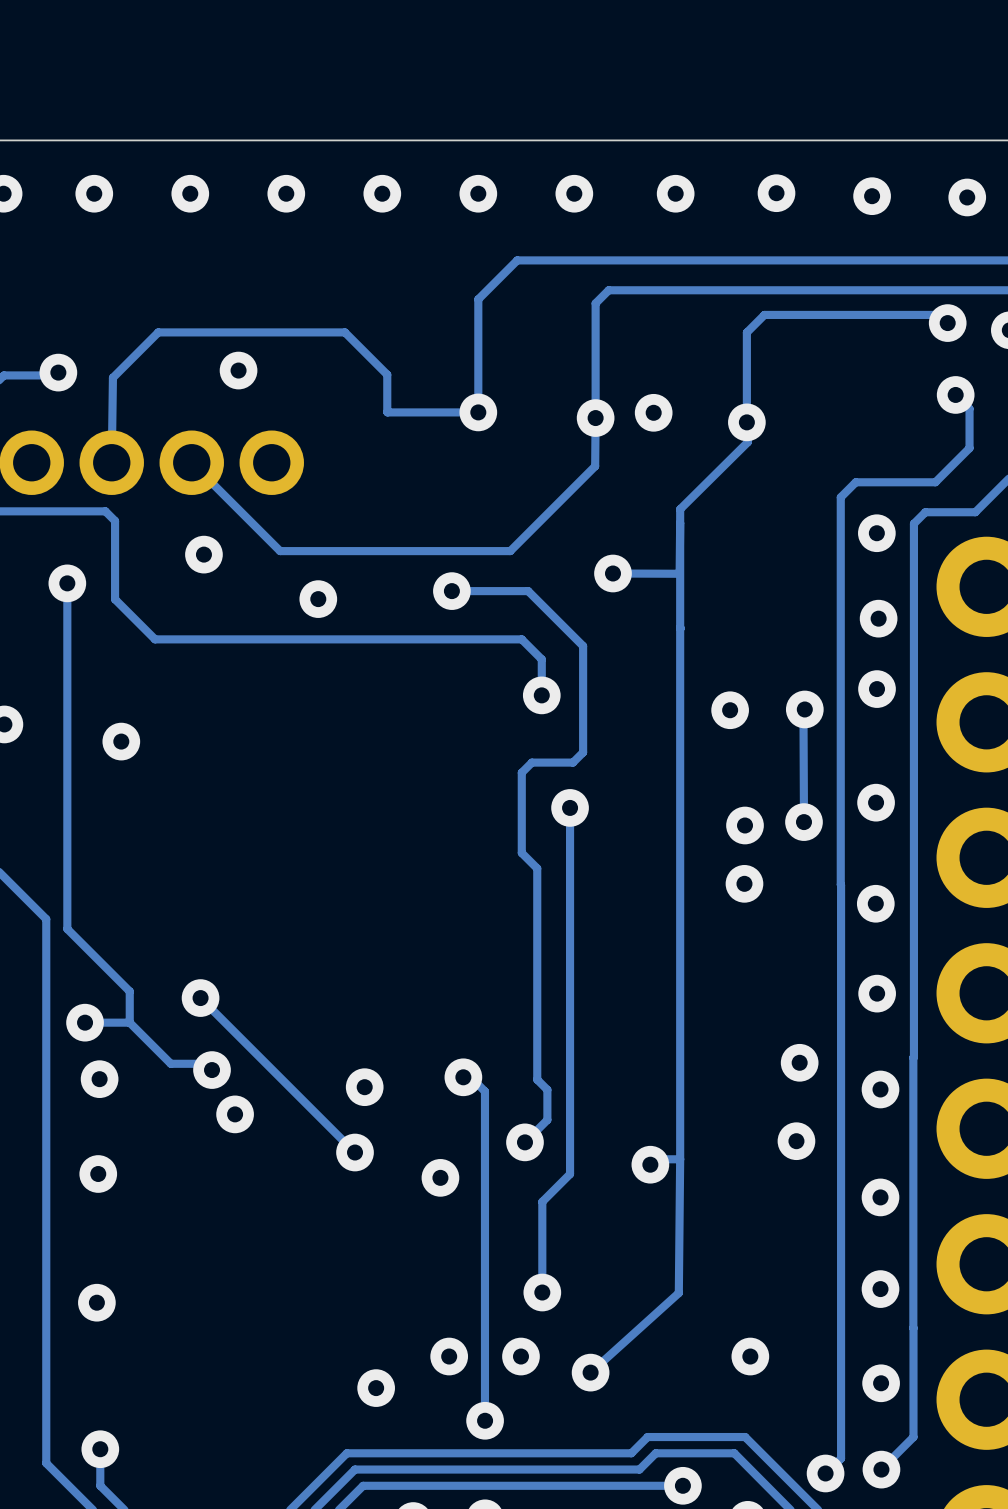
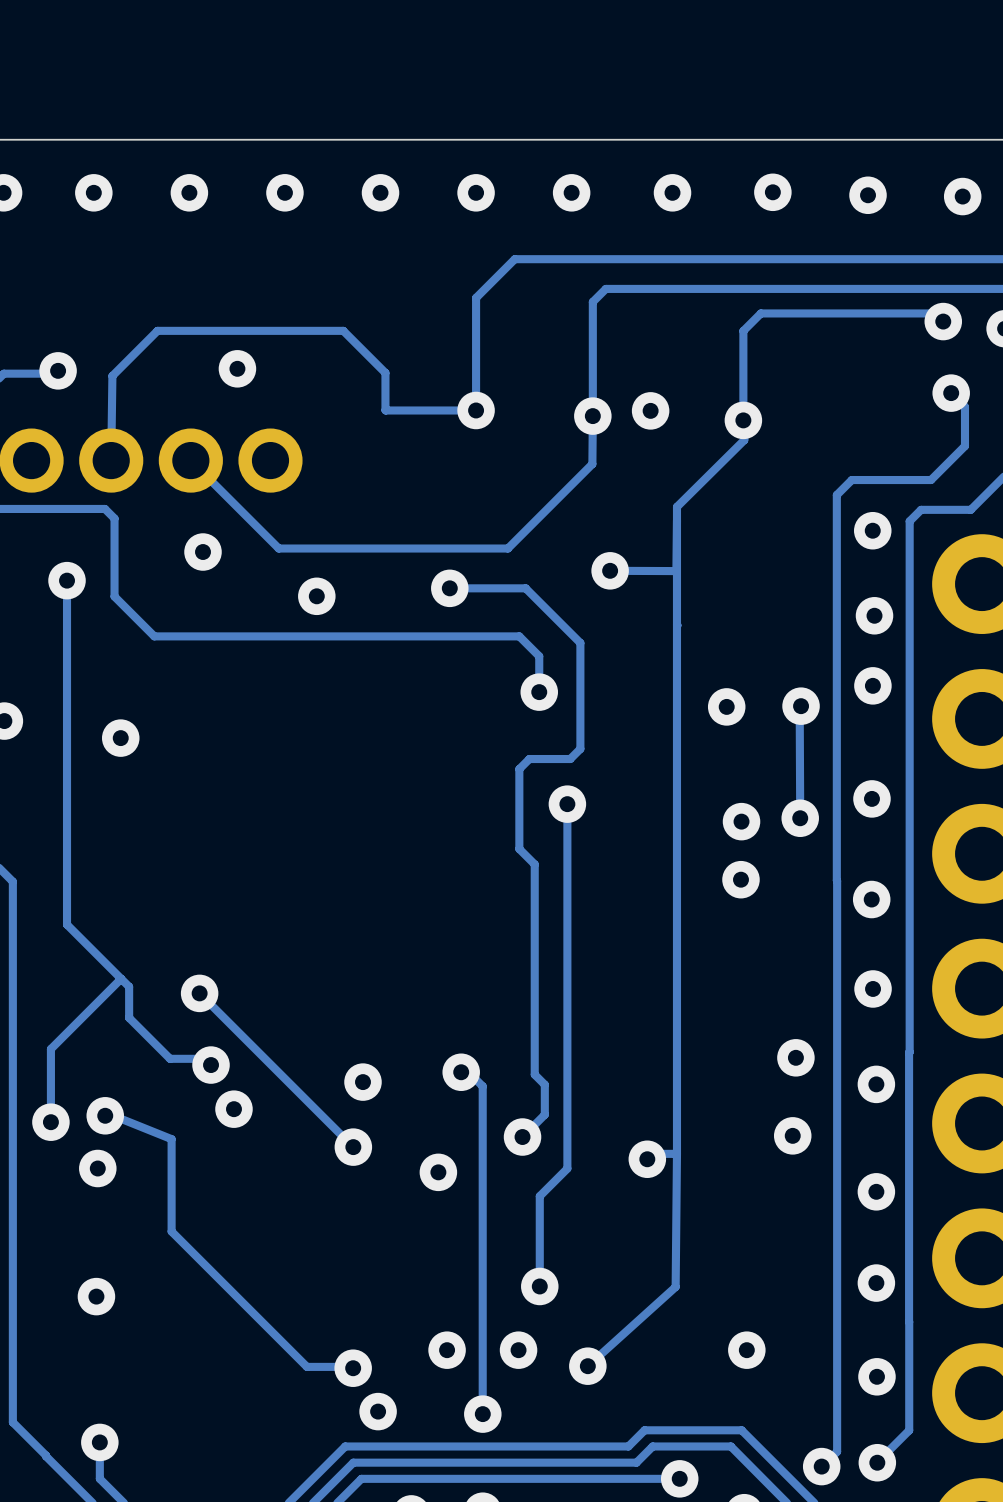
track: (12, 885) (46, 919) (46, 1462) -> (12, 881) (12, 1422) (46, 1455)
track: none -> (121, 978) (50, 1049) (50, 1122)
via: (85, 1022) -> none
track: (129, 1022) (85, 1022) -> none
via: (99, 1079) -> none
track: none -> (105, 1115) (113, 1115) (171, 1139) (171, 1231) (306, 1366) (353, 1368)
via: none -> (105, 1115)
via: none -> (50, 1122)
via: none -> (353, 1368)
via: (376, 1388) -> none
via: none -> (378, 1411)

